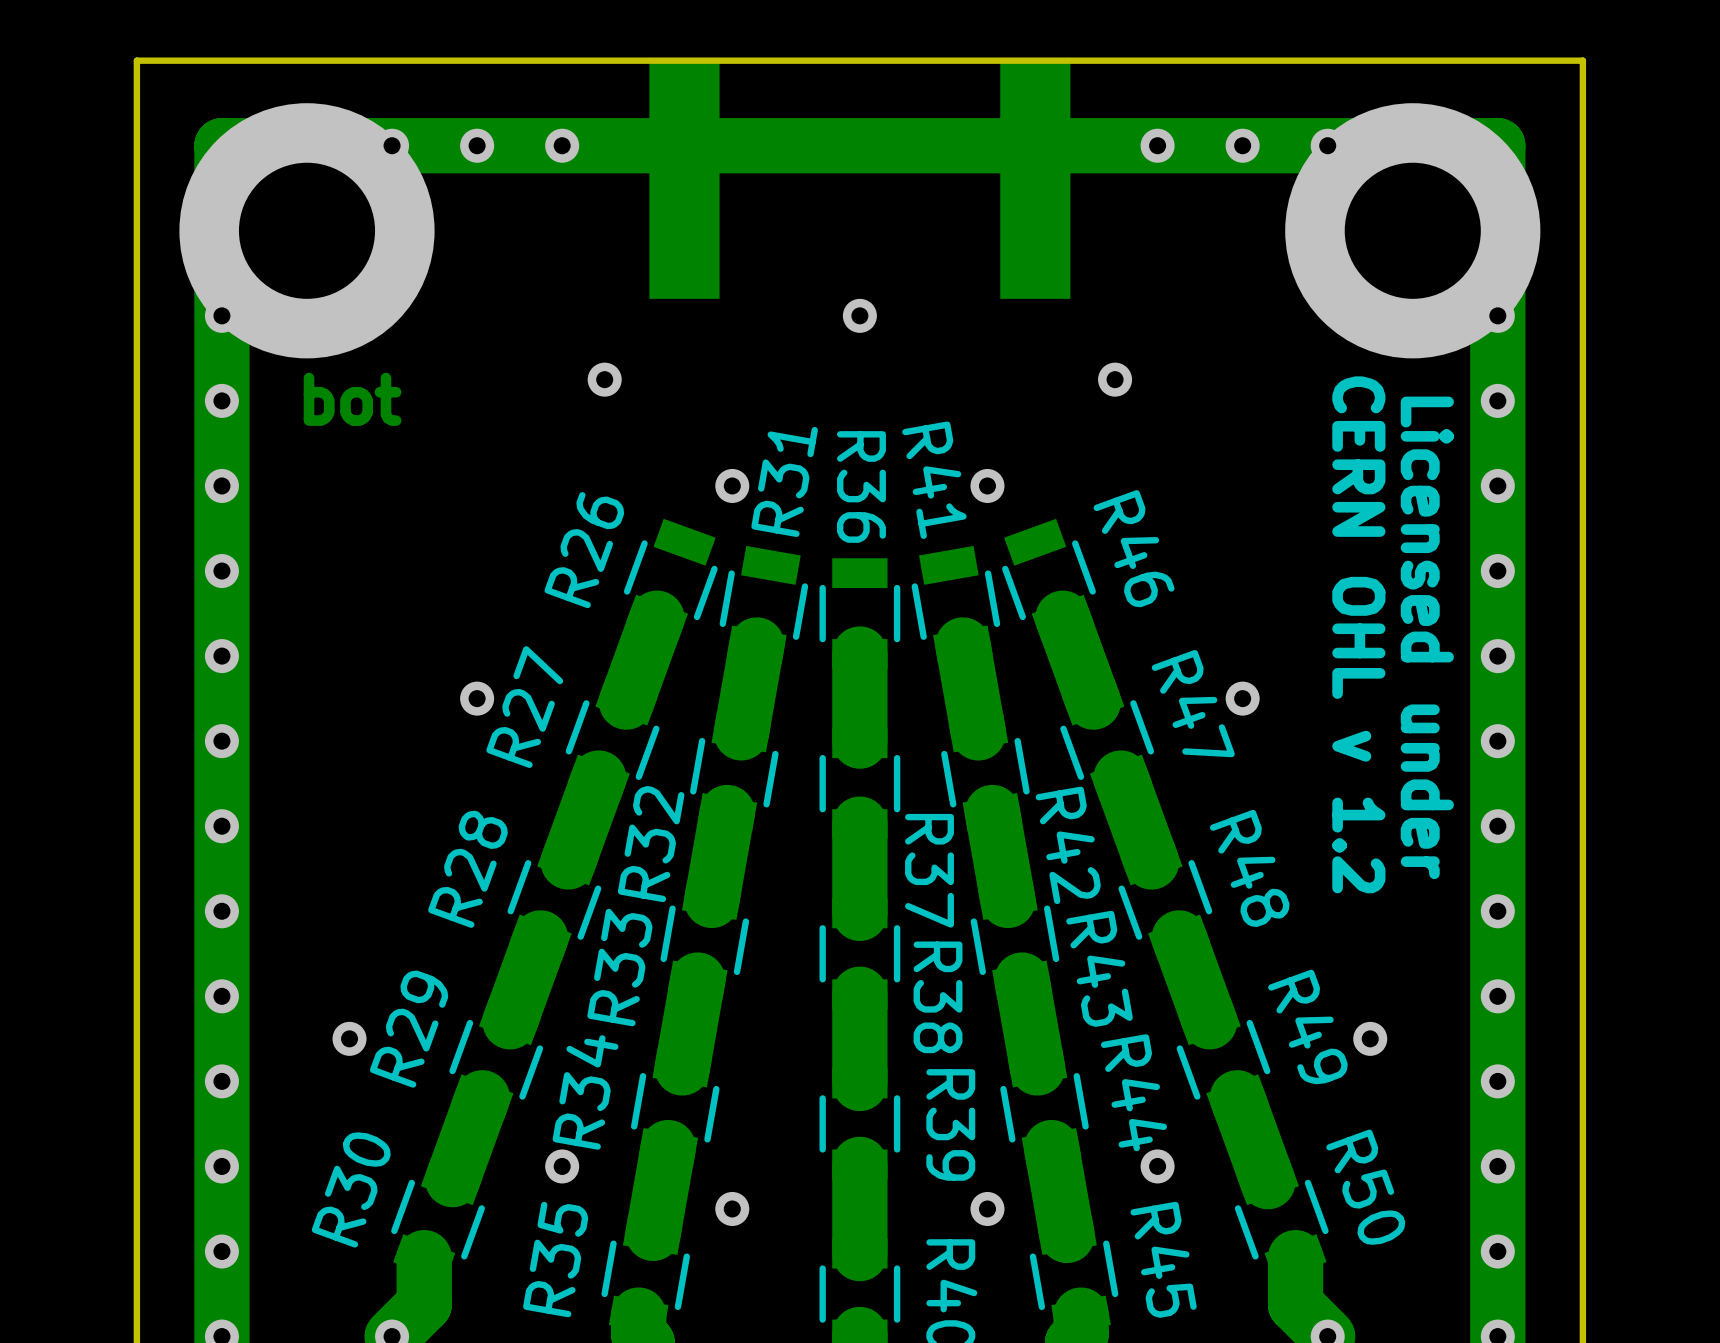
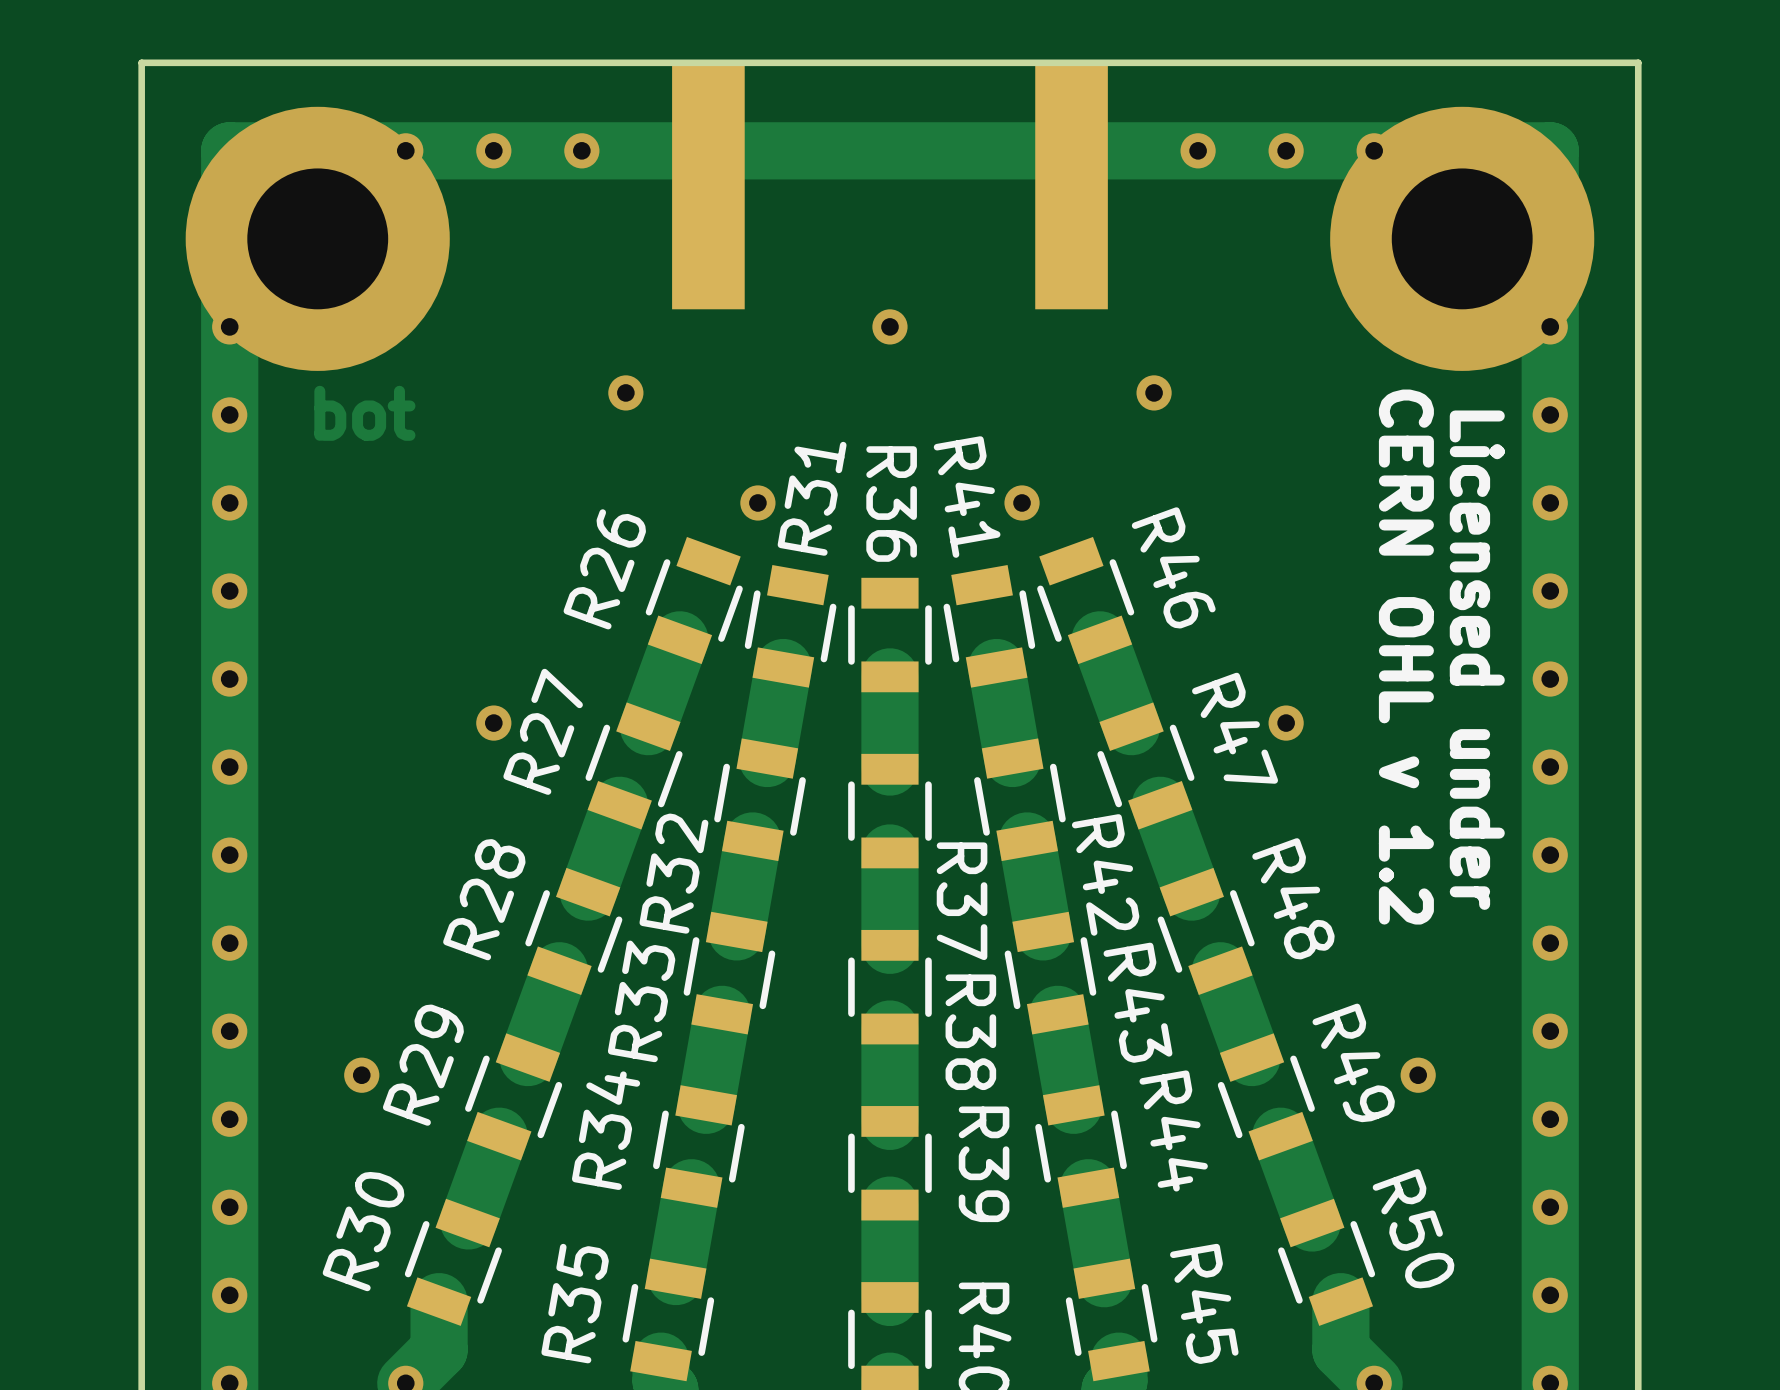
via: (562, 1166) -> none
via: (1157, 1166) -> none
via: (732, 1208) -> none
via: (987, 1208) -> none

